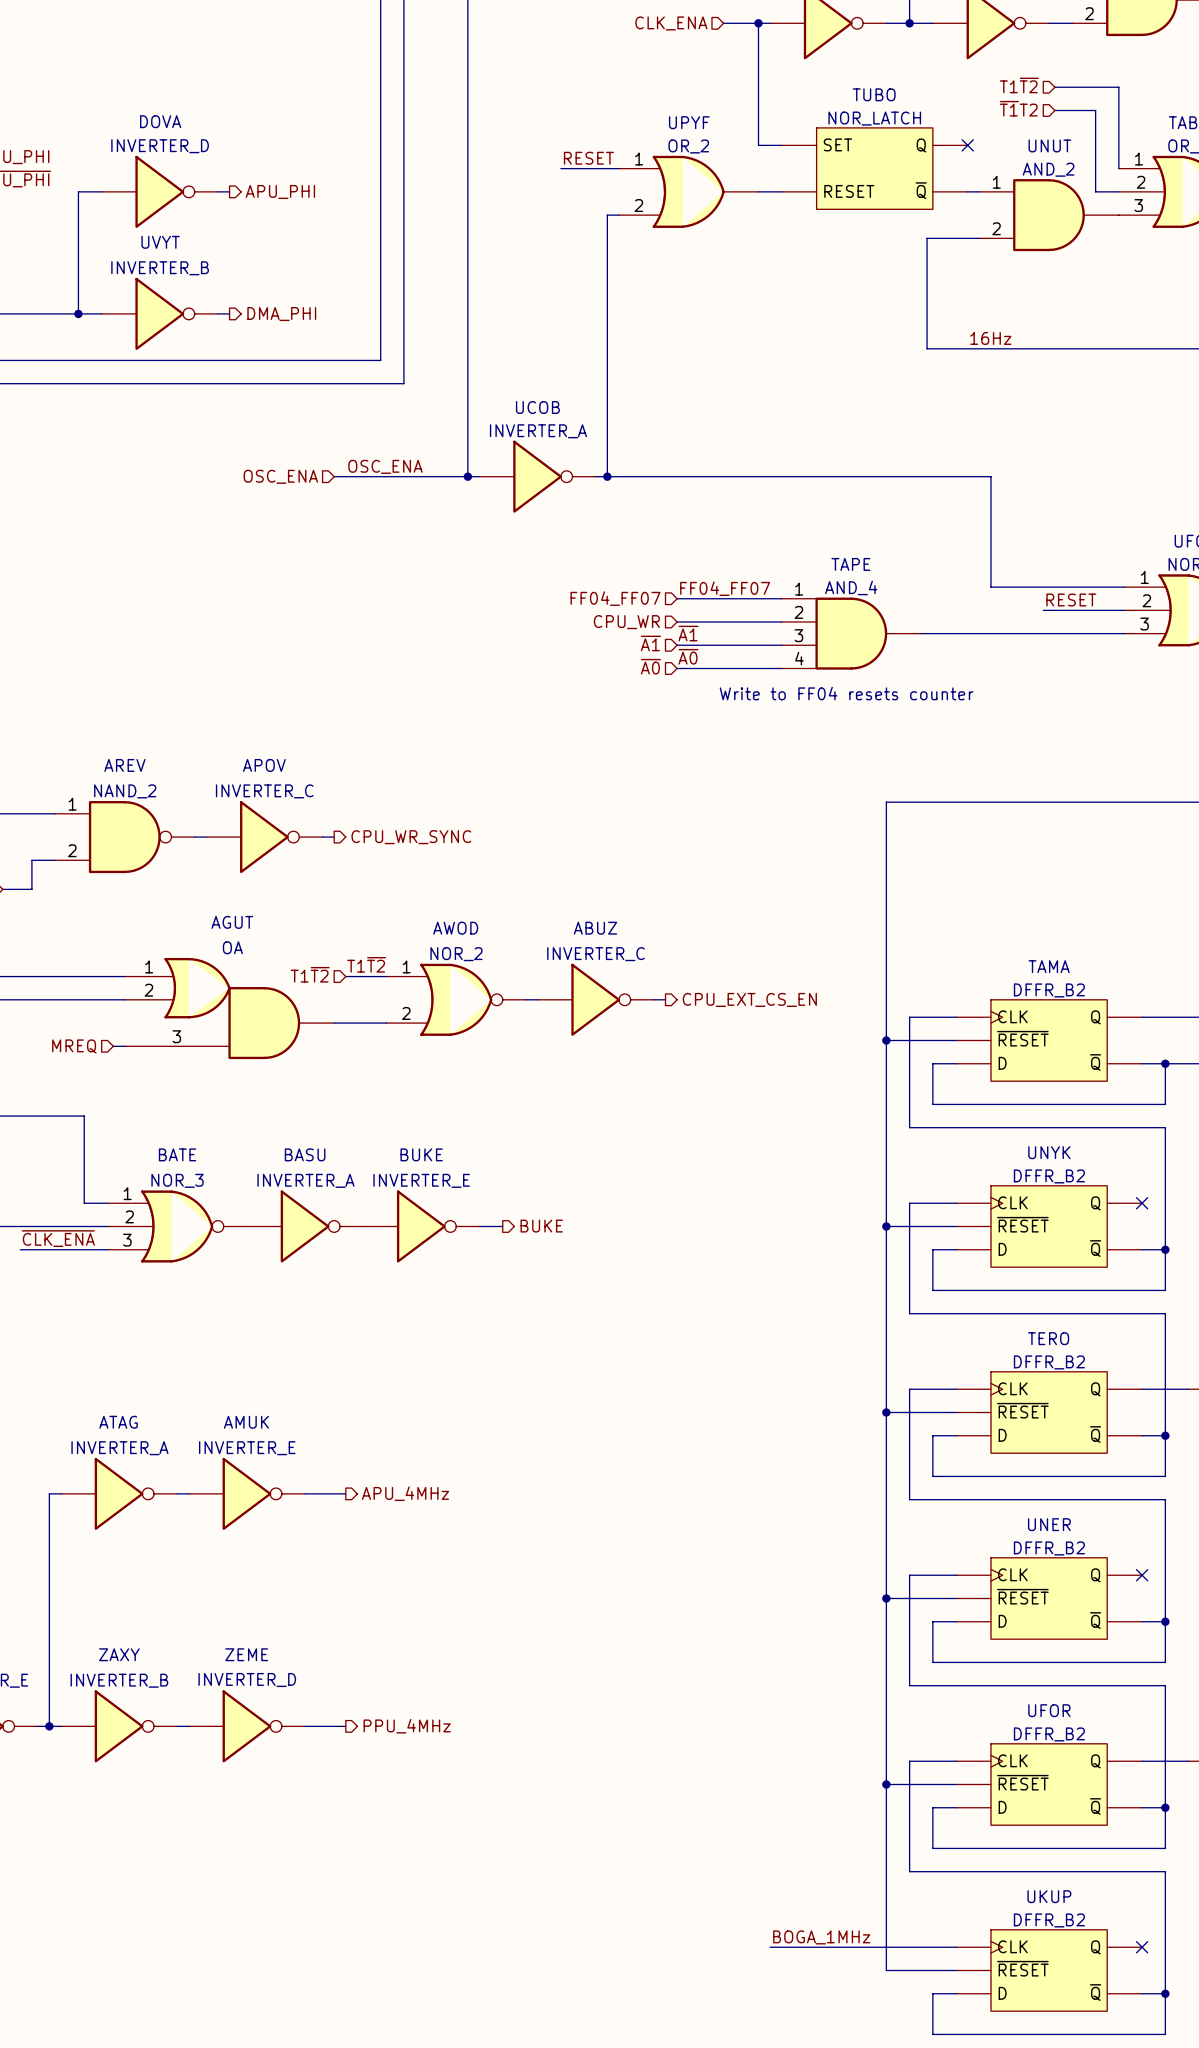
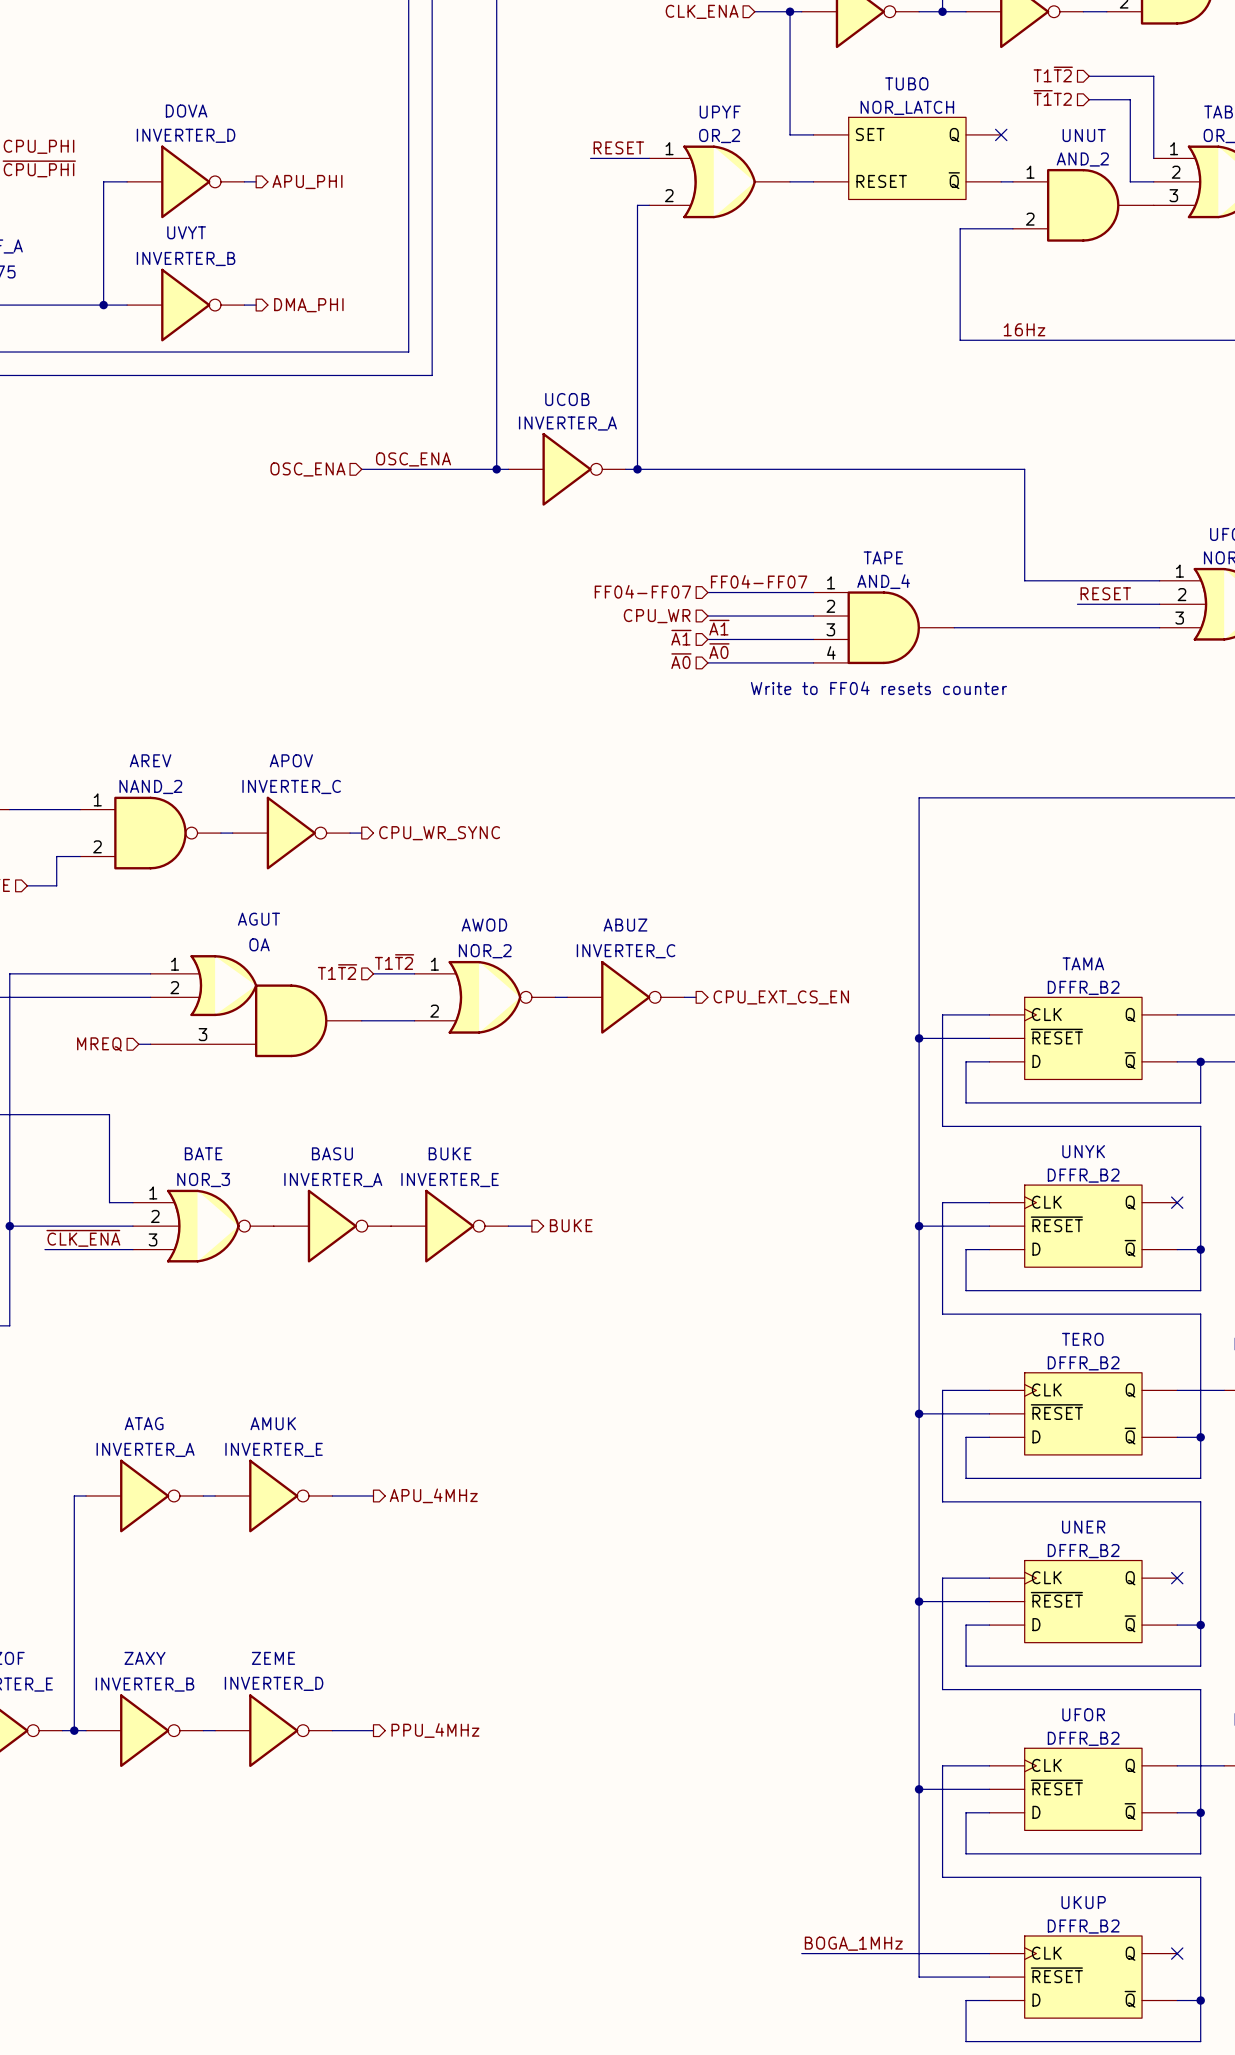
label: FF04_FF07 (725, 588) -> FF04-FF07 (759, 581)
hierarchical label: FF04_FF07 (615, 598) -> FF04-FF07 (642, 591)

